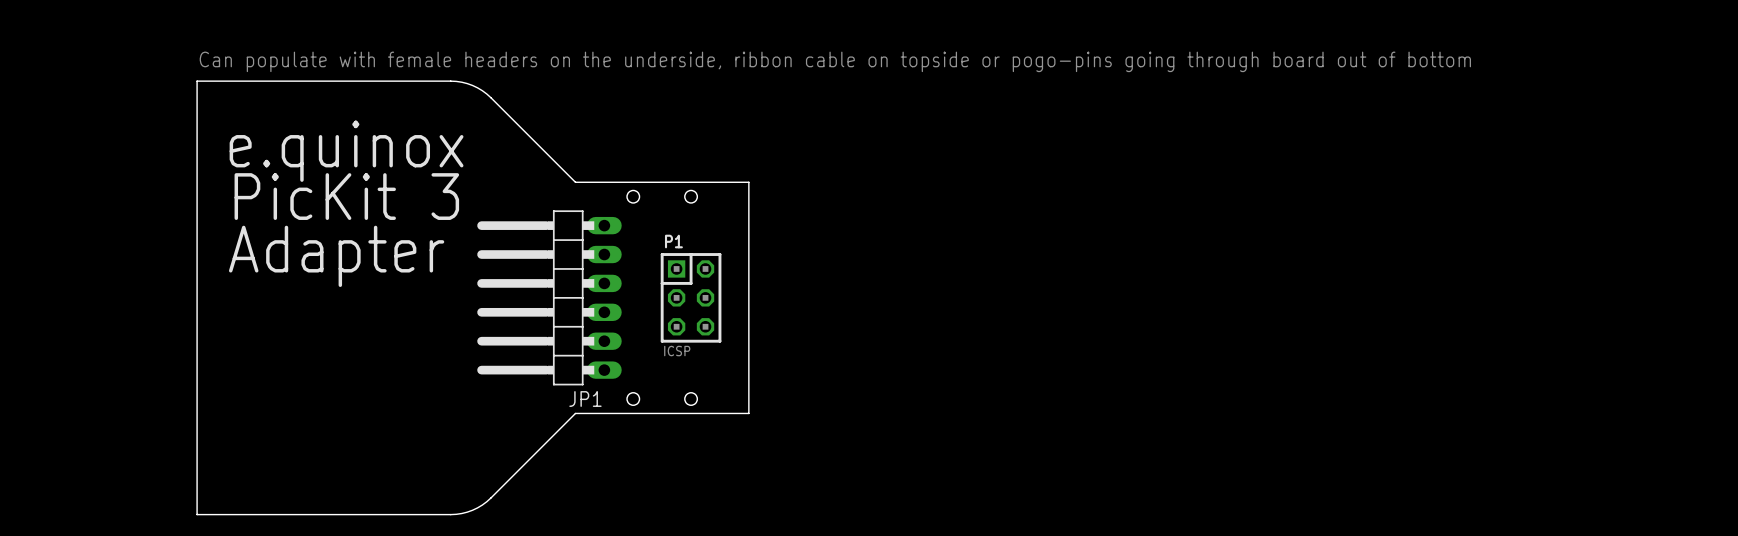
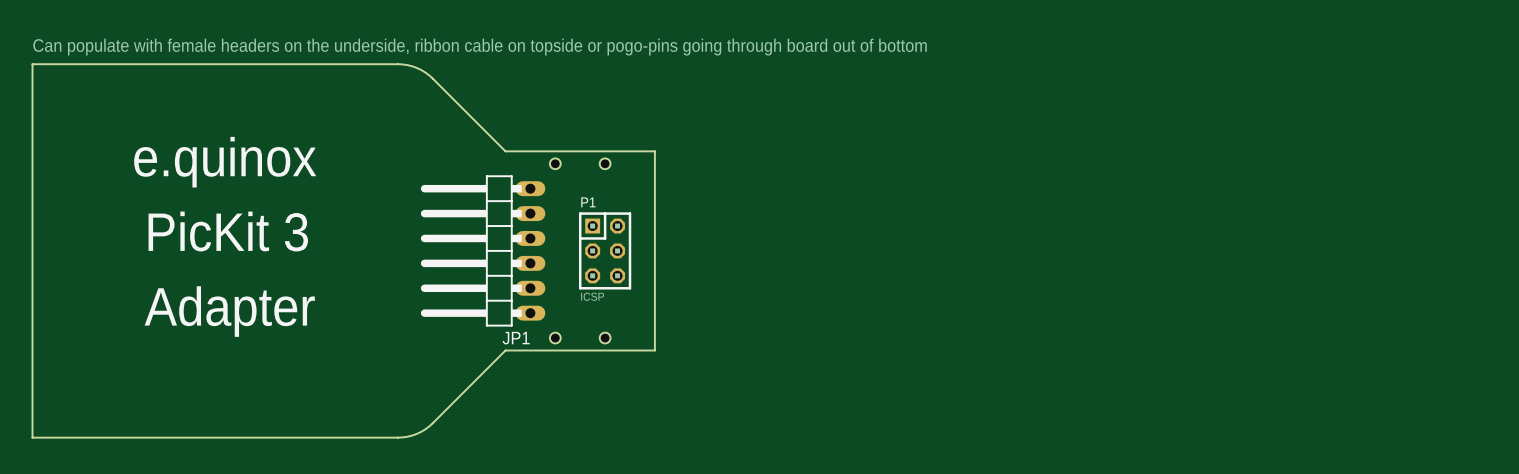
text position: Can populate with female headers on the underside, ribbon cable on topside or pogo-pins going through board out of bottom (835, 61) -> Can populate with female headers on the underside, ribbon cable on topside or pogo-pins going through board out of bottom (480, 47)
board edge: (197, 81) (197, 514) -> (179, 64) (32, 64) (32, 437) (179, 437)
text position: e.quinox (346, 151) -> e.quinox (225, 162)
text position: PicKit 3 (346, 196) -> PicKit 3 (228, 231)
text position: Adapter (336, 256) -> Adapter (229, 311)

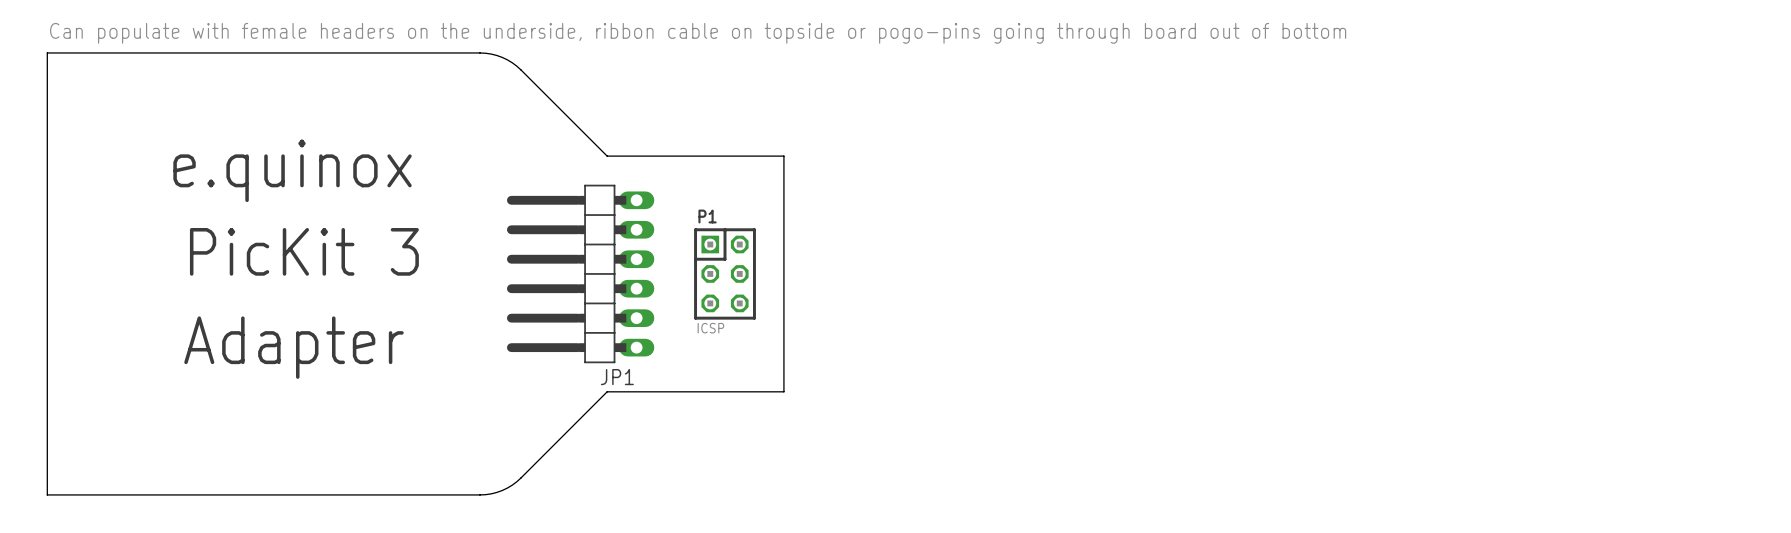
hole: (555, 163) -> none
hole: (605, 163) -> none
hole: (555, 338) -> none
hole: (605, 338) -> none

